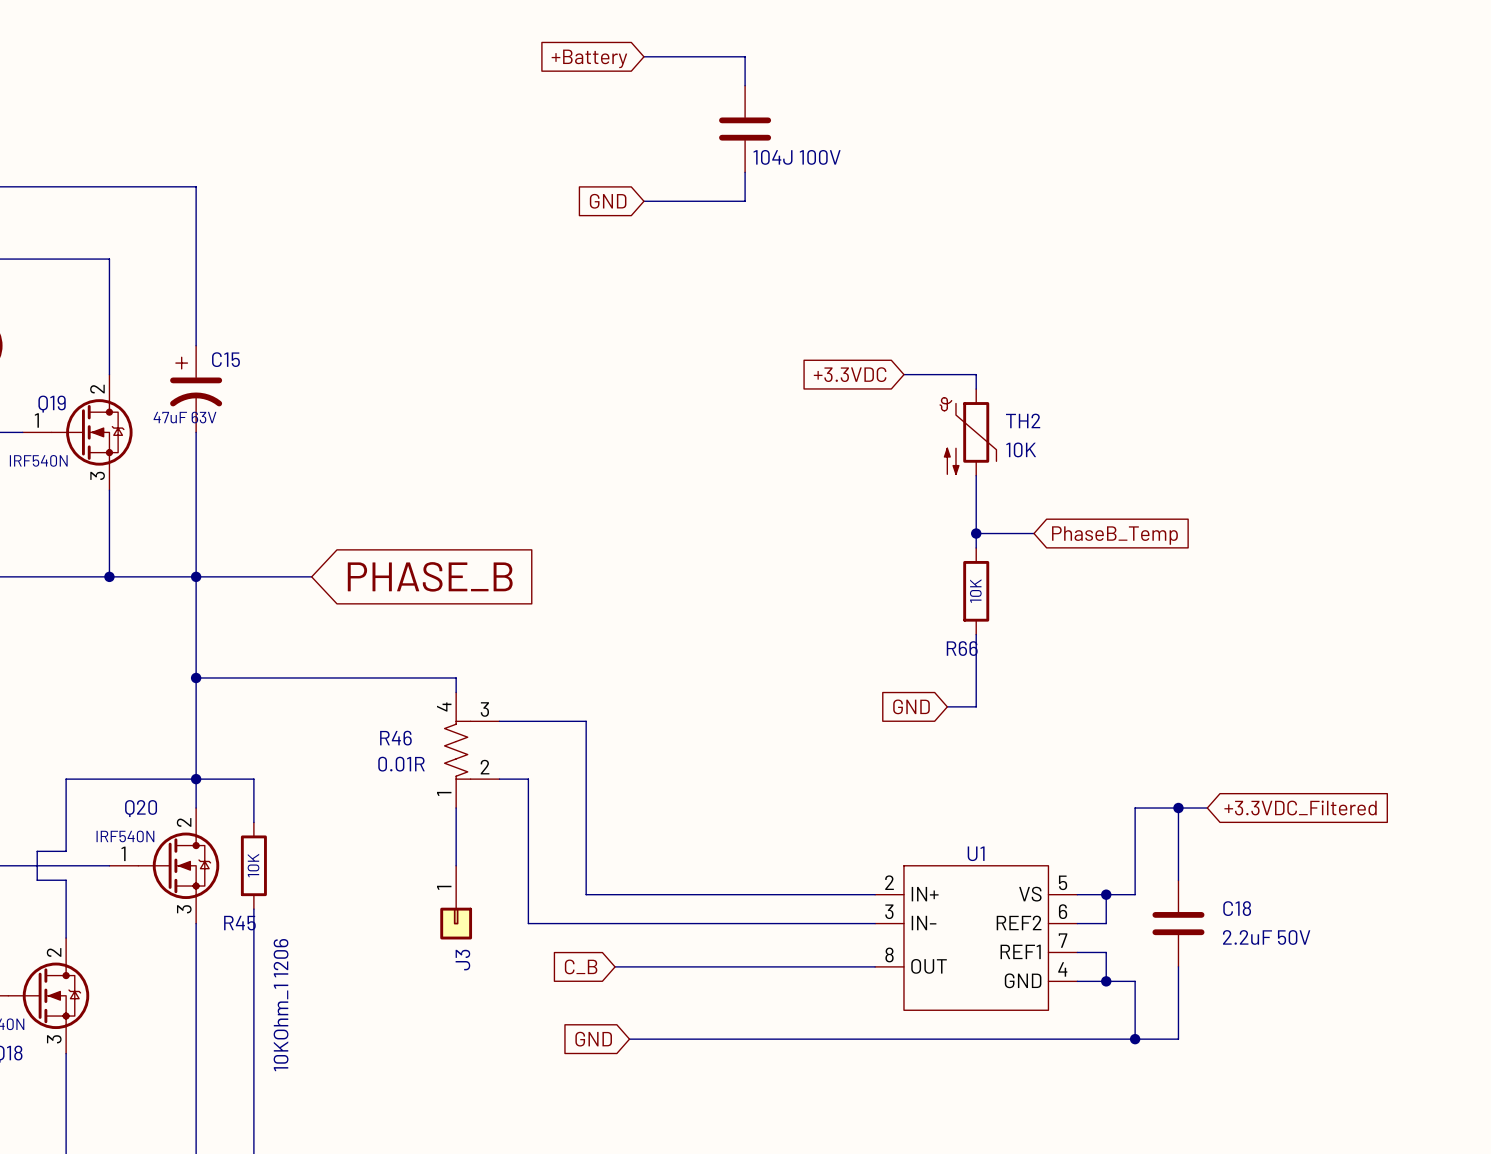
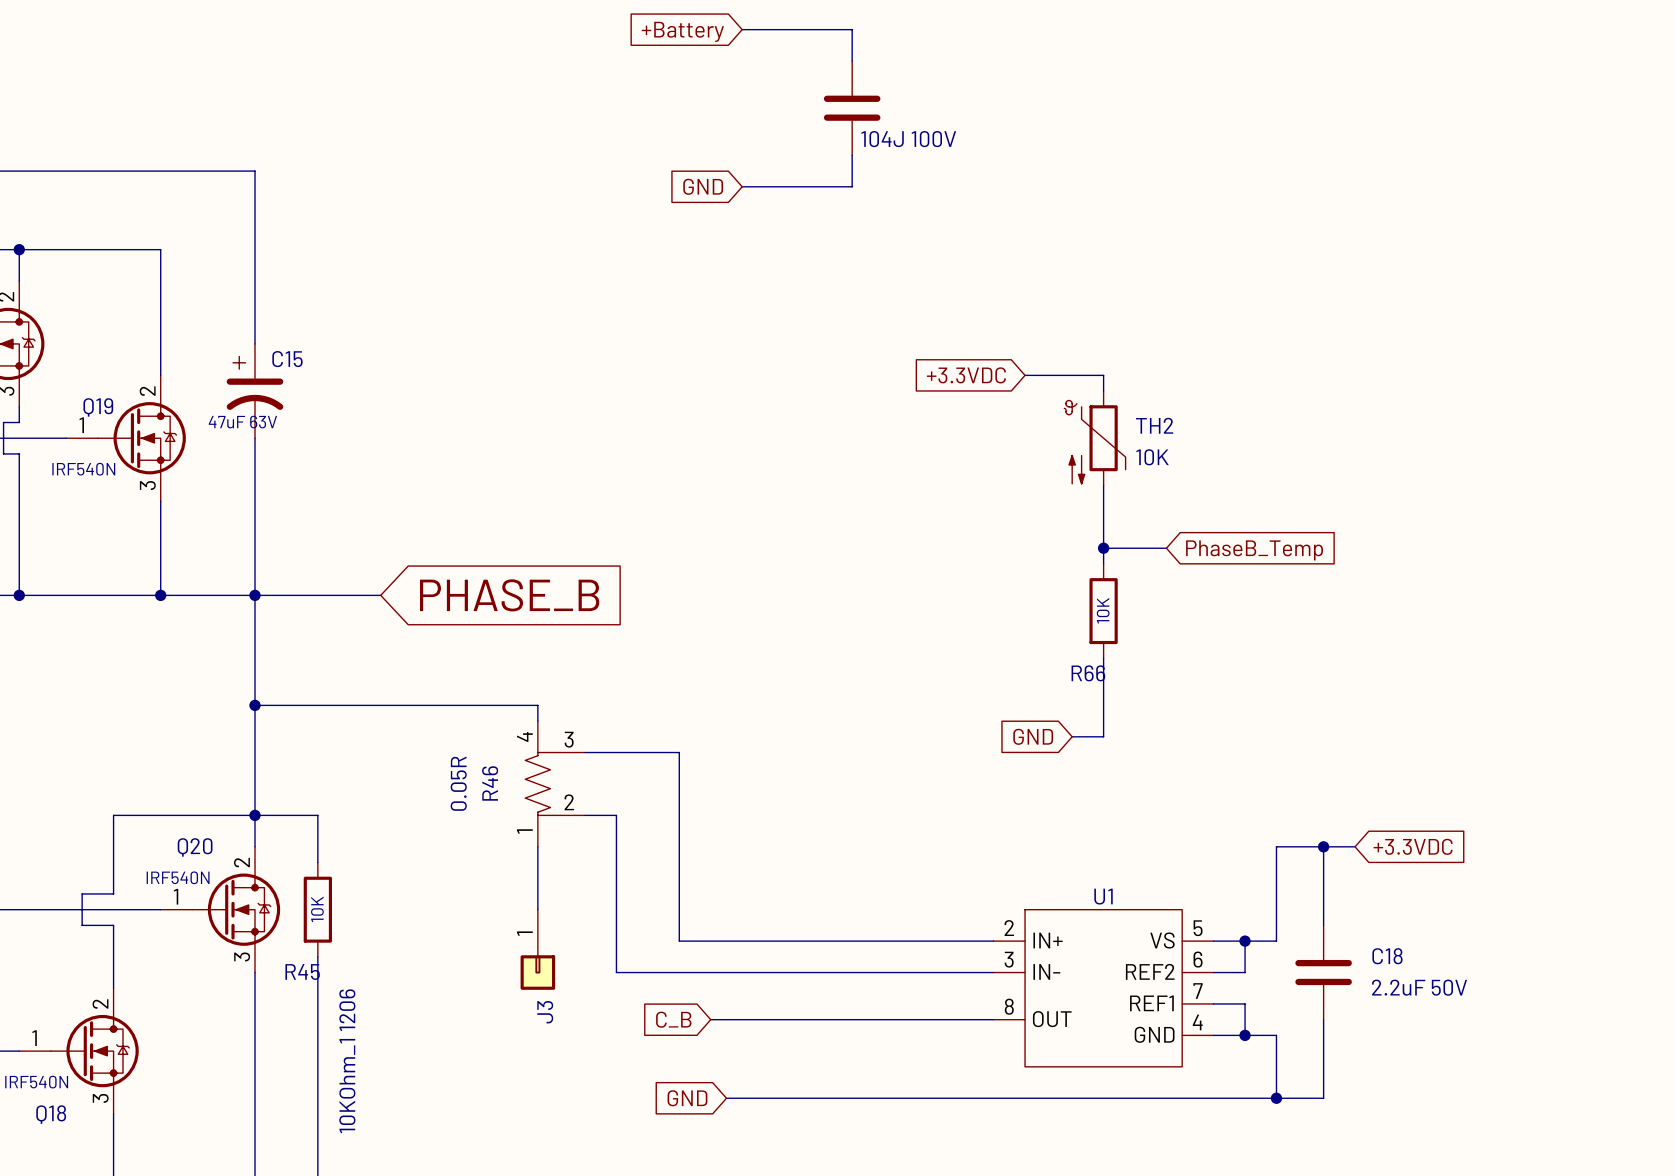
R46 name rotation: 0° (395, 738) -> 90° counterclockwise (490, 783)
R46 value: 0.01R (401, 764) -> 0.05R (458, 783)
global label: +3.3VDC_Filtered (1300, 807) -> +3.3VDC (1413, 846)

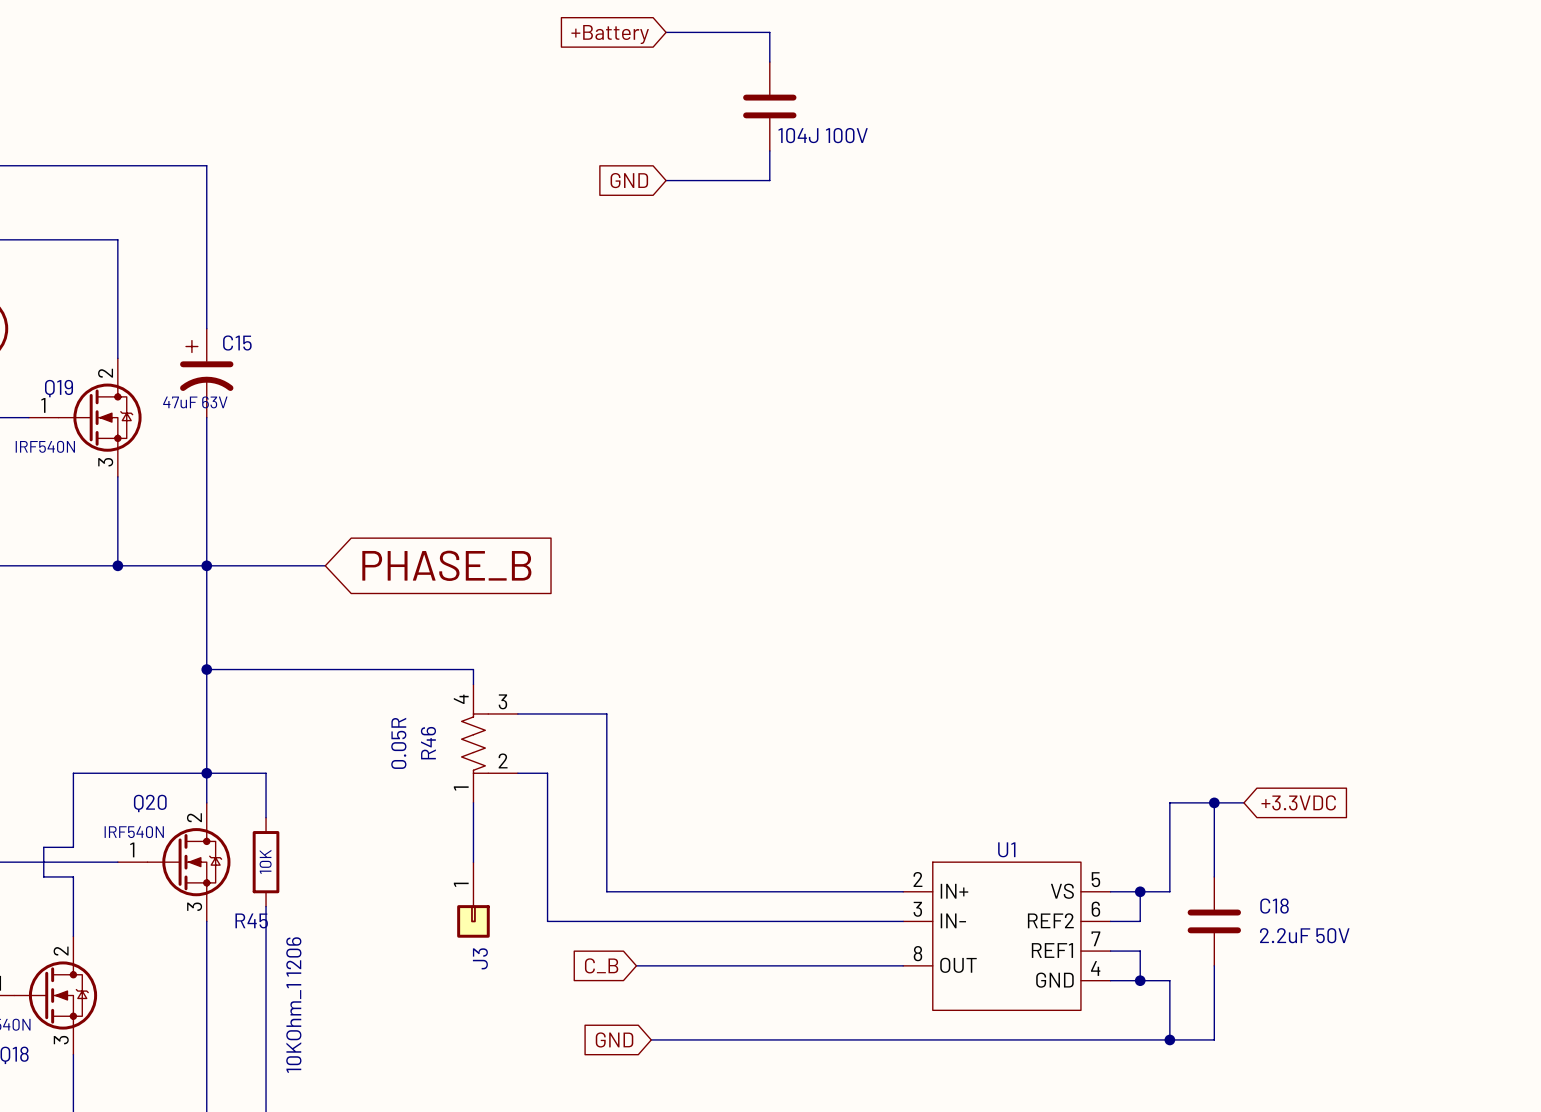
global label: +3.3VDC (966, 375) -> none
wire: (1025, 375) (1103, 375) (1103, 391) -> none
TH2: 10K (1094, 438) -> none
wire: (1103, 485) (1103, 563) -> none
wire: (1103, 548) (1166, 548) -> none
junction: (1103, 548) -> none
global label: PhaseB_Temp (1254, 550) -> none
R66: 10K (1103, 611) -> none
wire: (1103, 658) (1103, 736) (1072, 736) -> none
global label: GND (1033, 736) -> none

